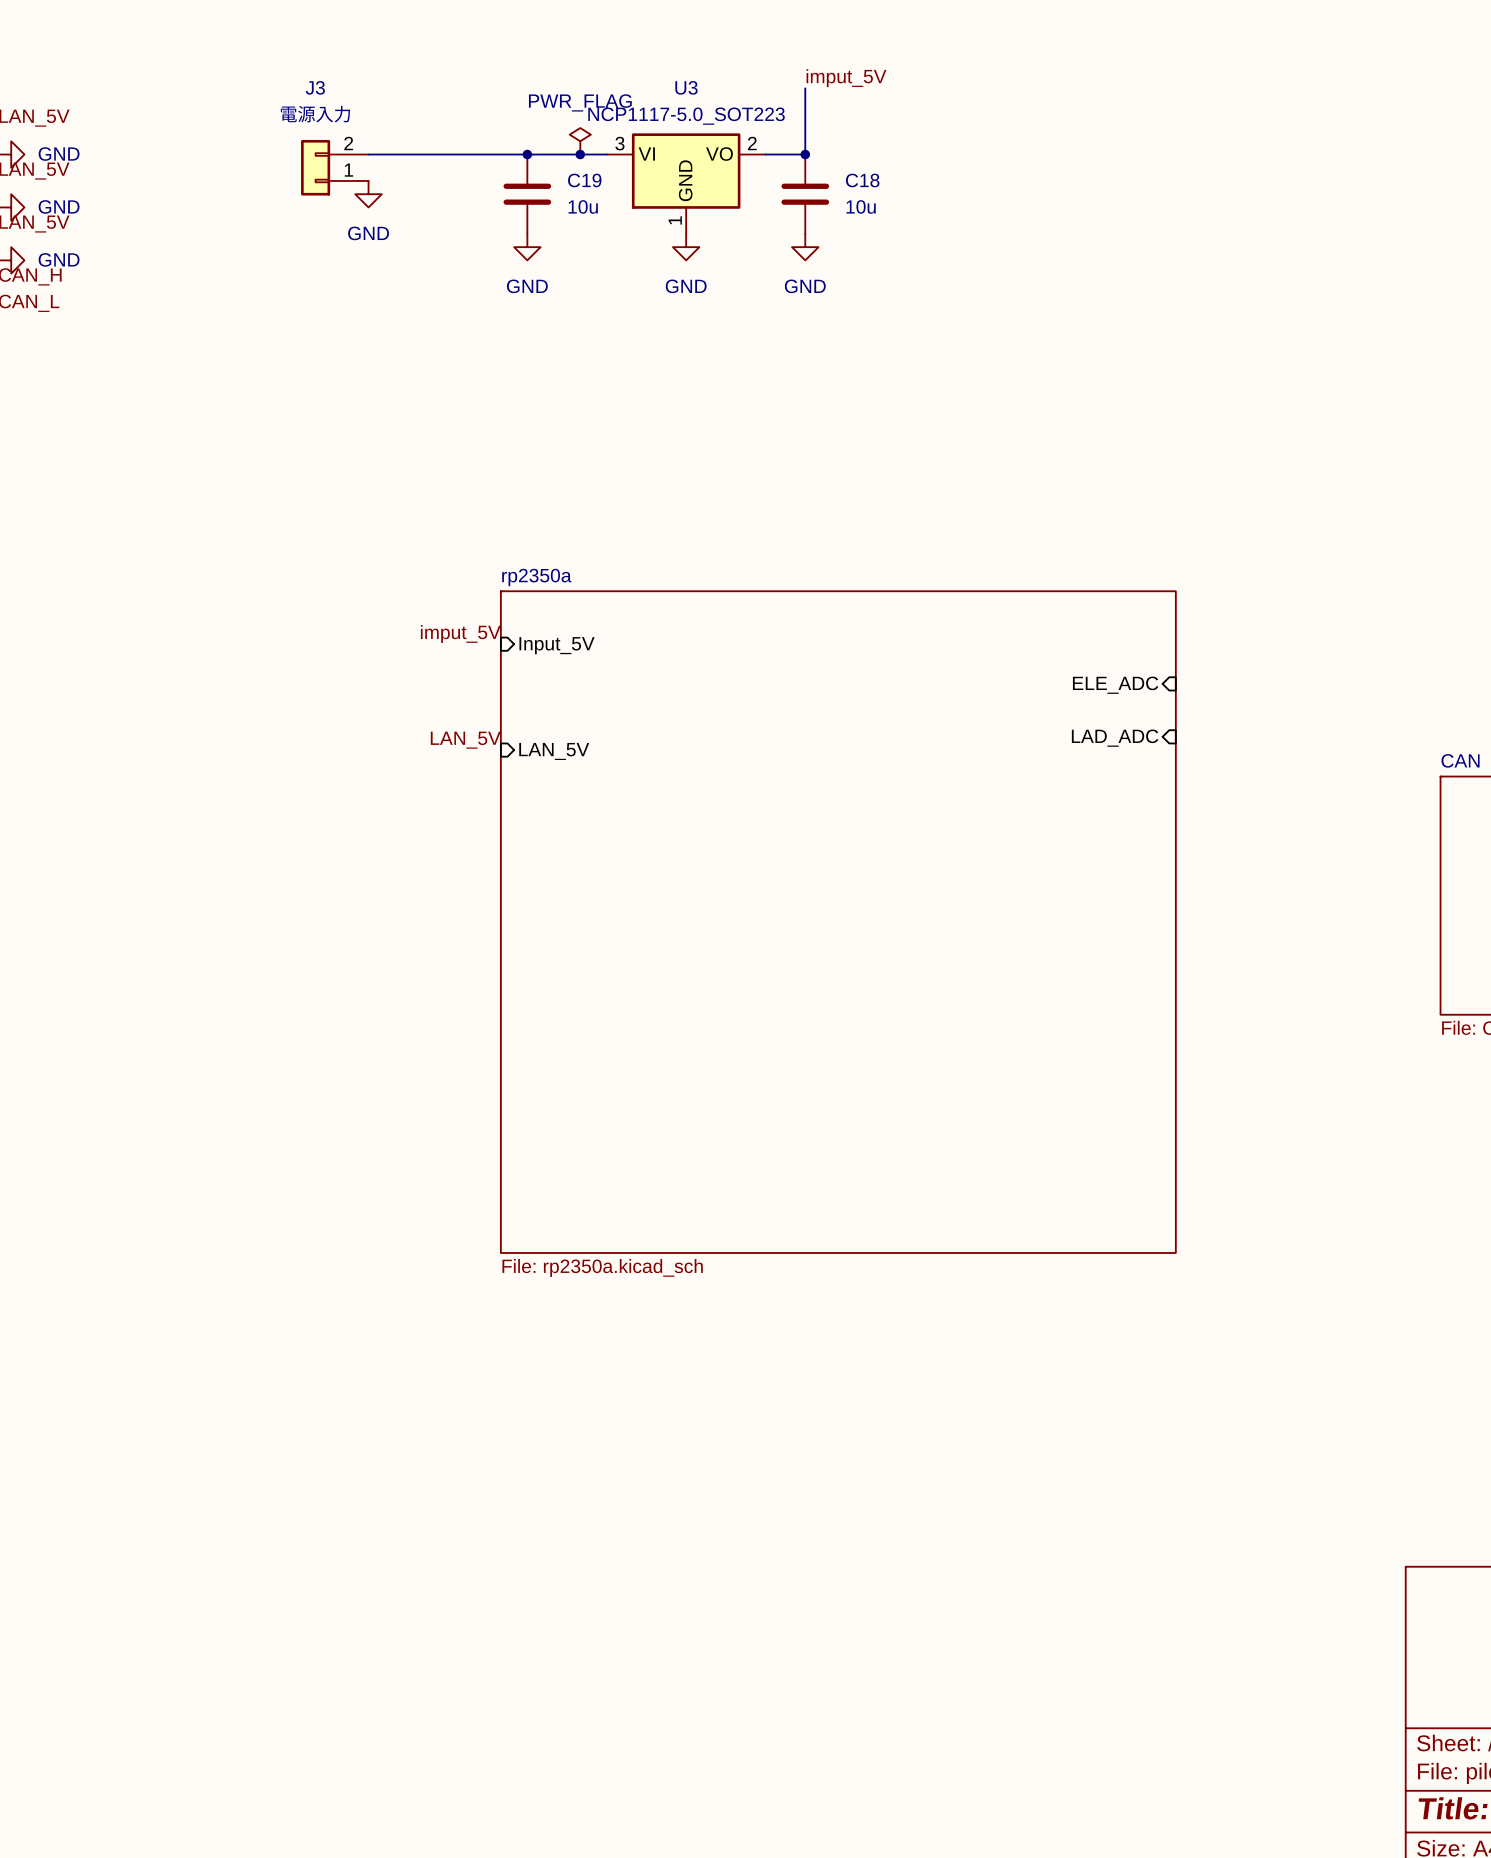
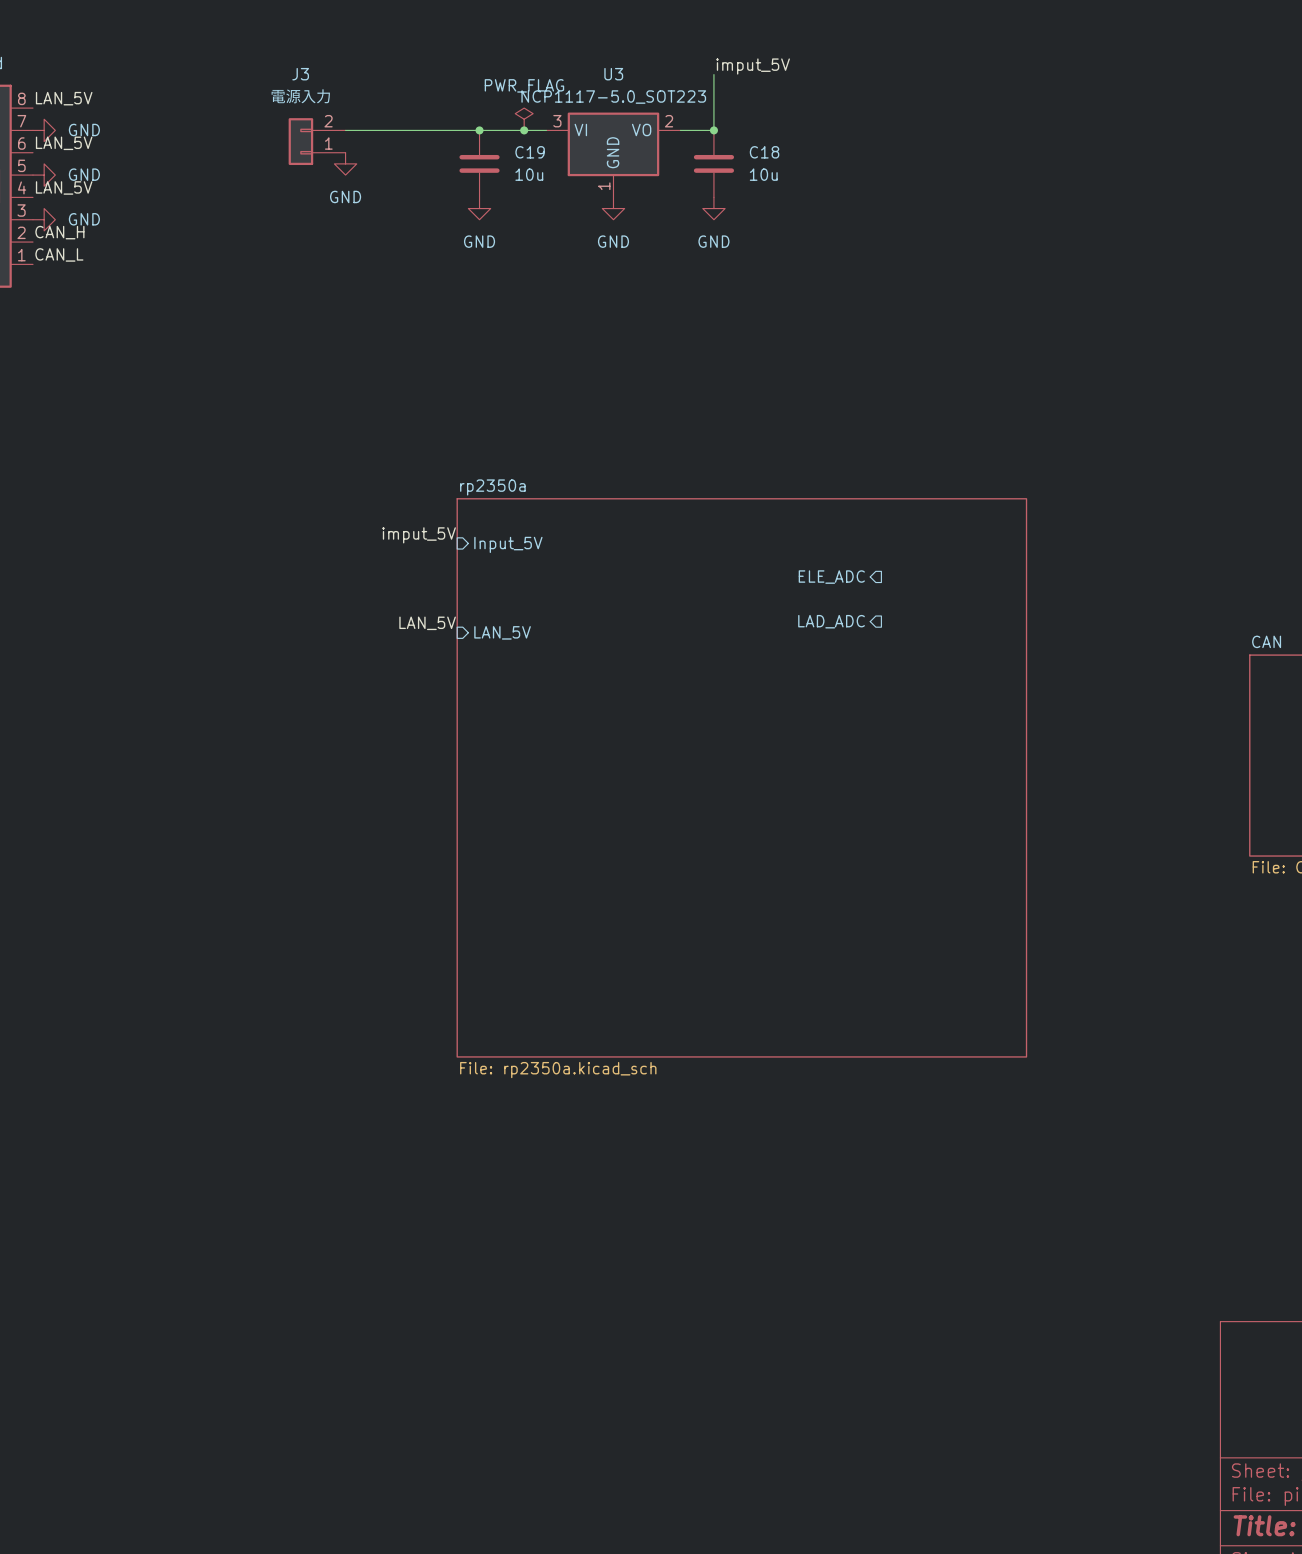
sheet pin position: ELE_ADC (1115, 685) -> ELE_ADC (831, 577)
sheet pin position: LAD_ADC (1115, 738) -> LAD_ADC (831, 621)

